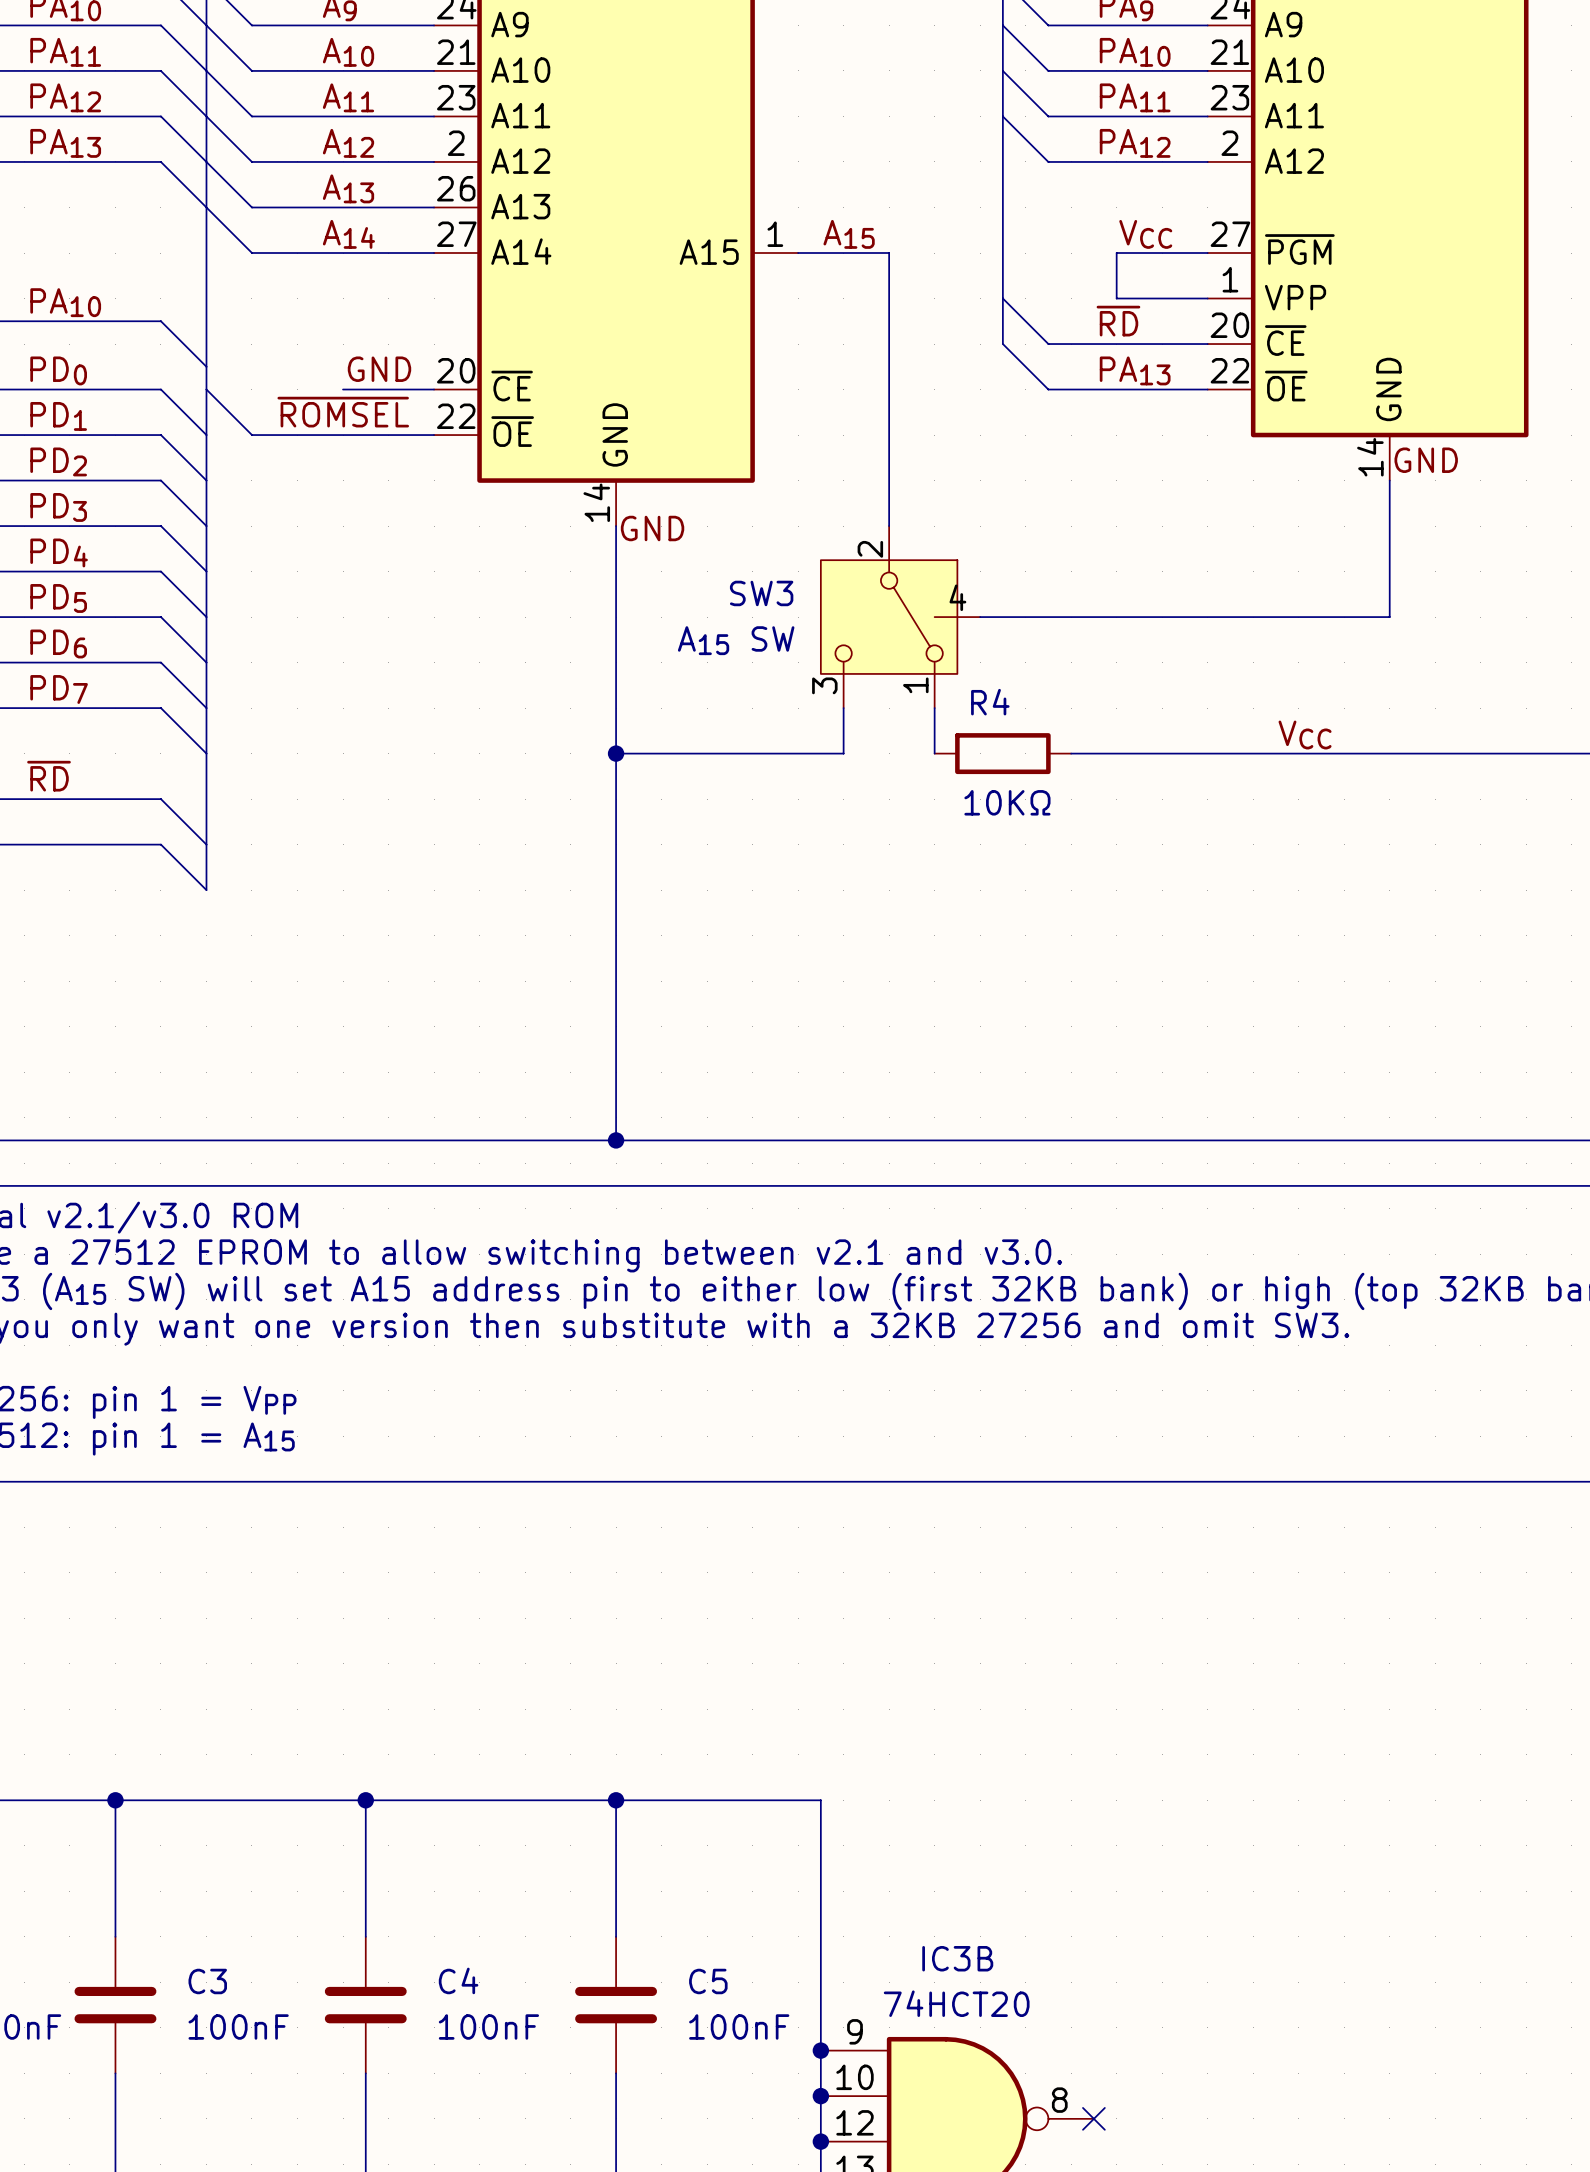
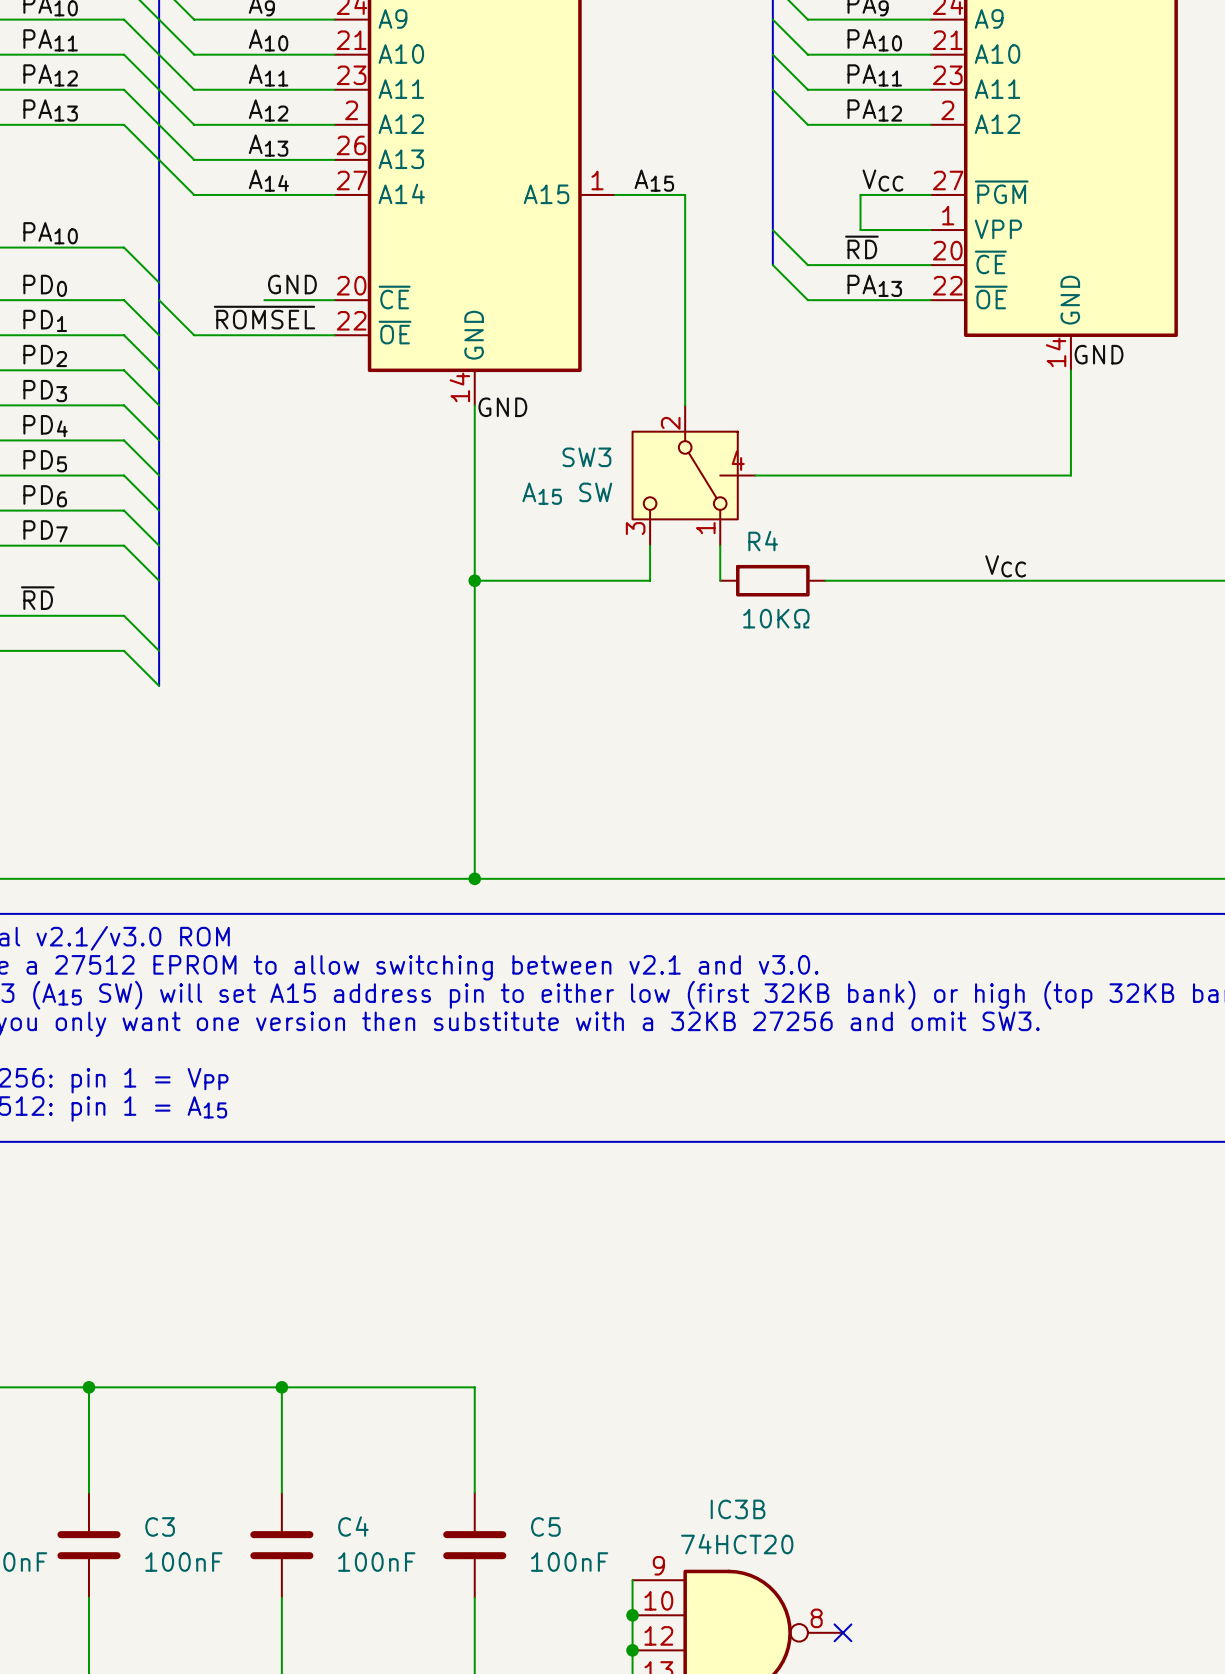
wire: (616, 1800) (820, 1800) (820, 2050) -> none
junction: (616, 1800) -> none
junction: (820, 2050) -> none

